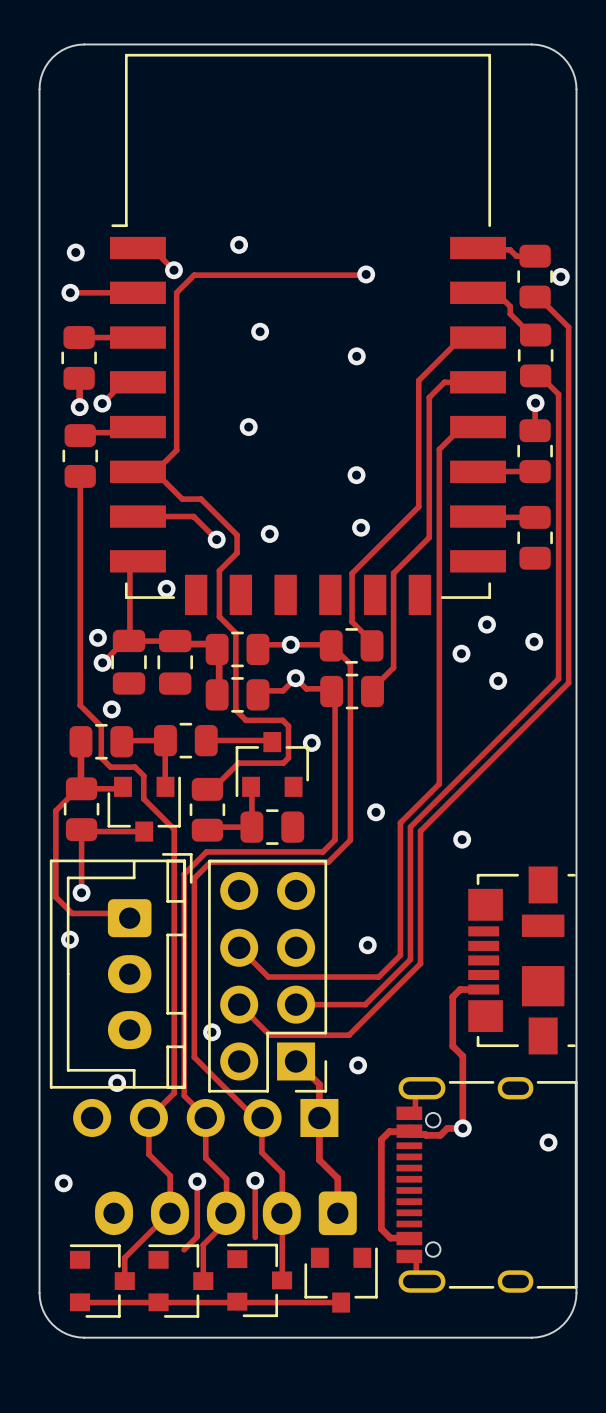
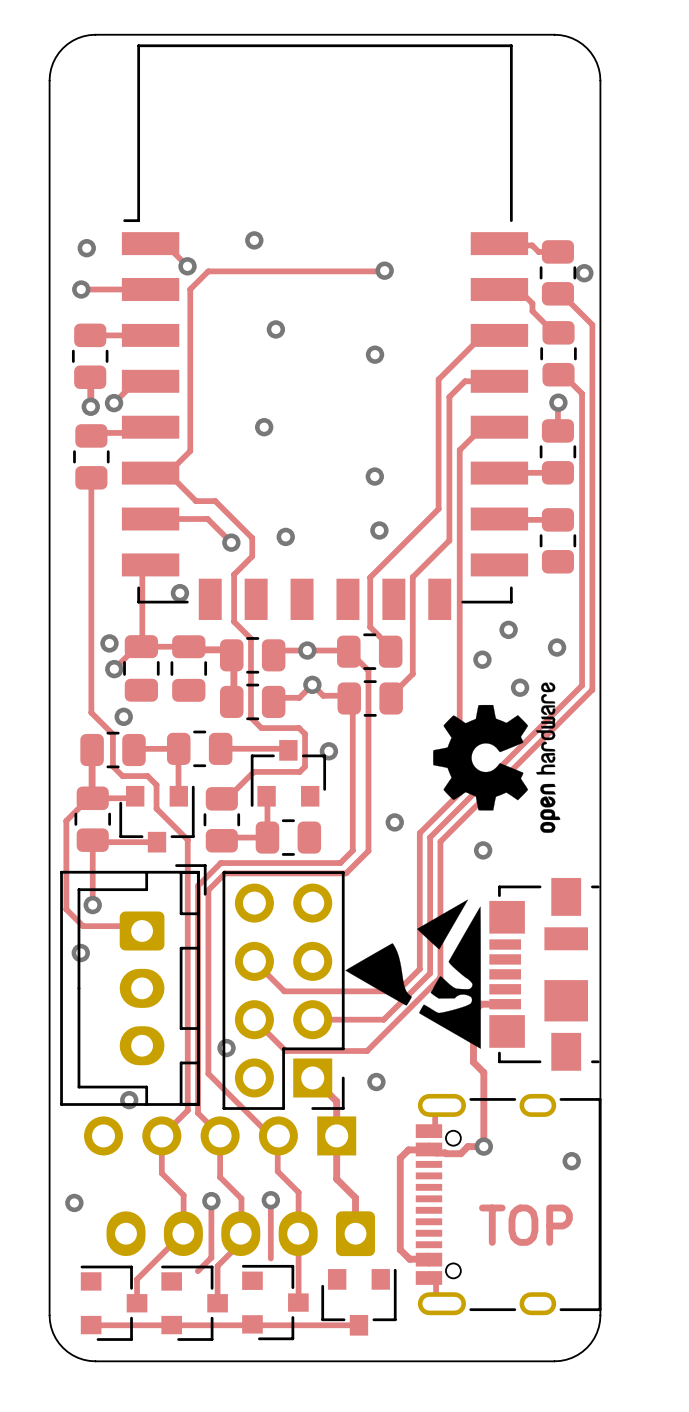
drawing: none -> [433, 682, 561, 833]
drawing: none -> [345, 899, 481, 1049]
text: none -> TOP (525, 1225)

